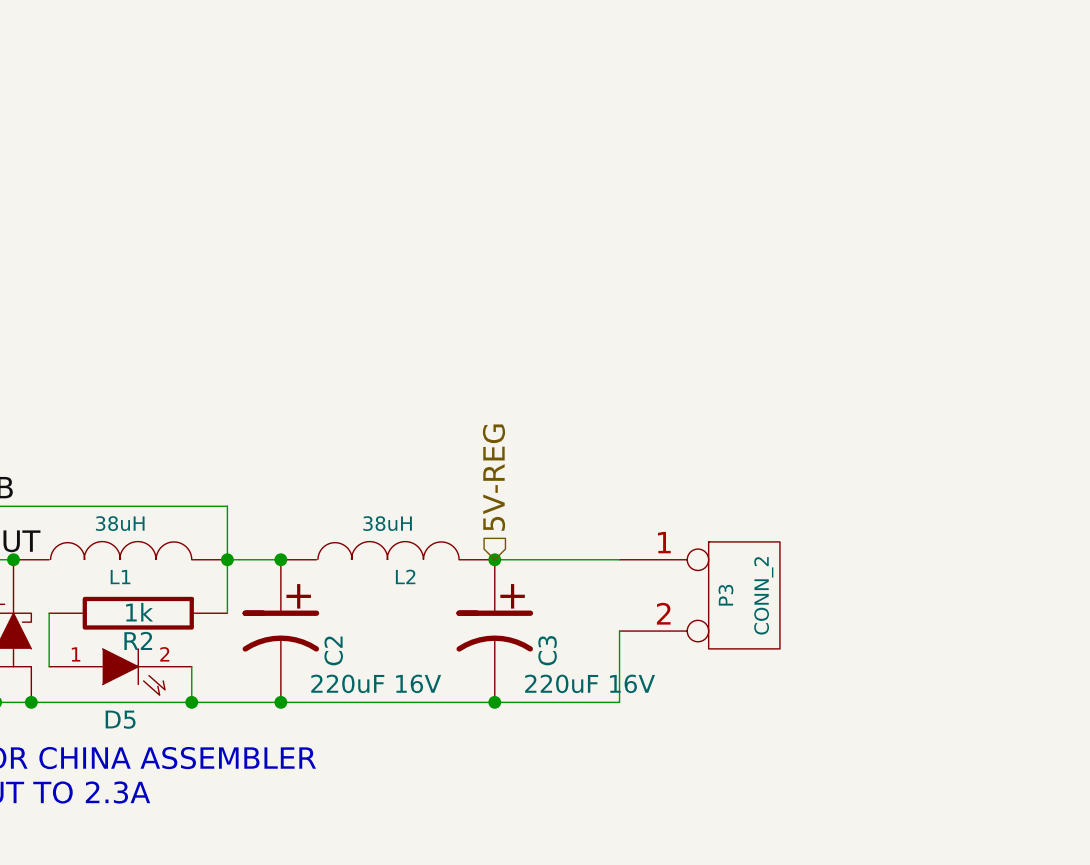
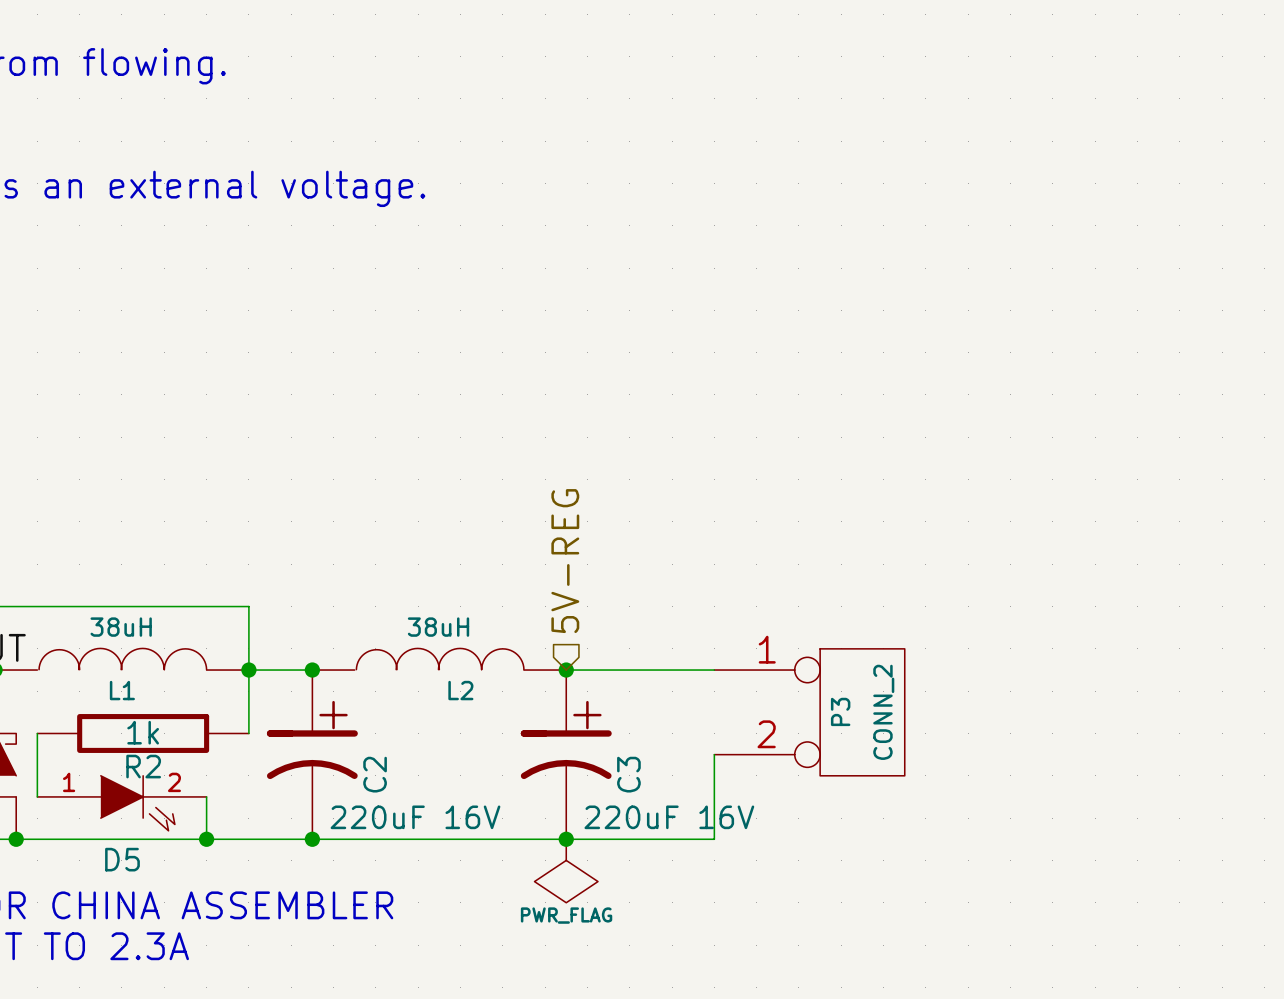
power symbol: none -> PWR_FLAG (566, 871)

